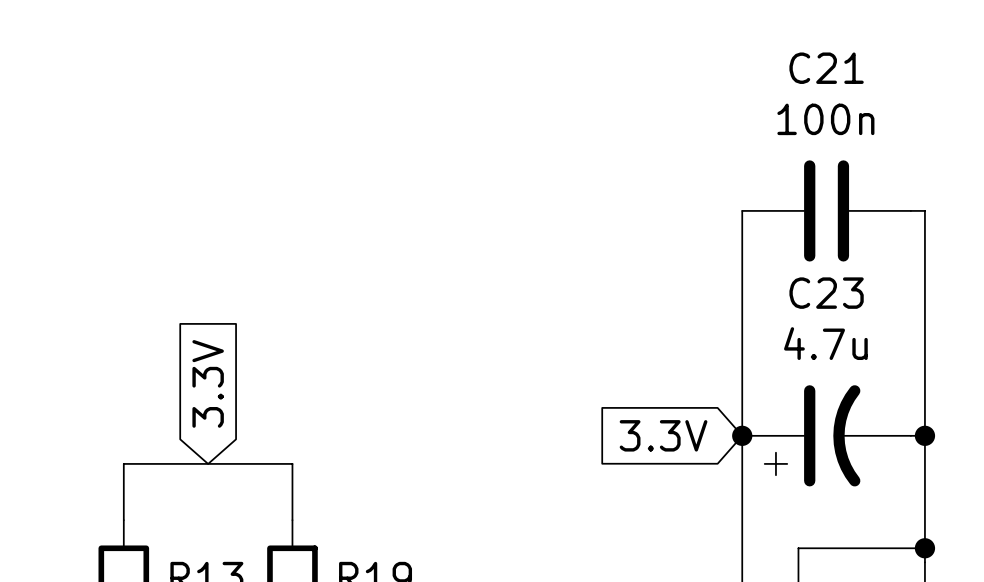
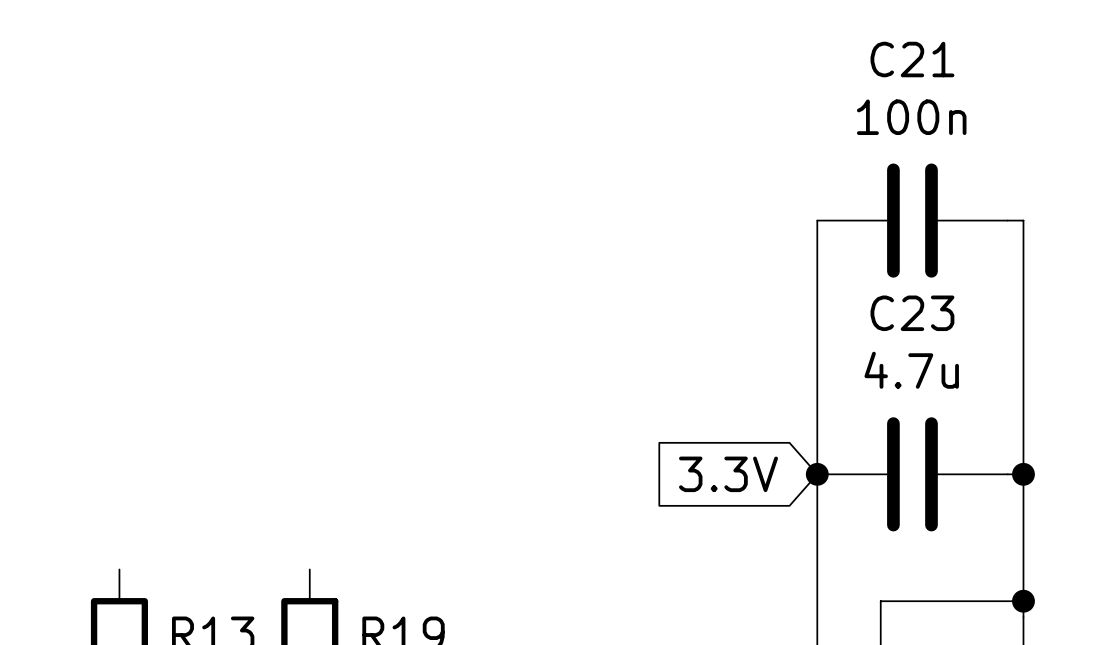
global label: 3.3V (208, 383) -> none
C23 symbol: [742, 385, 911, 487] -> [817, 417, 1008, 532]
wire: (123, 520) (123, 463) (292, 463) (292, 520) -> none

